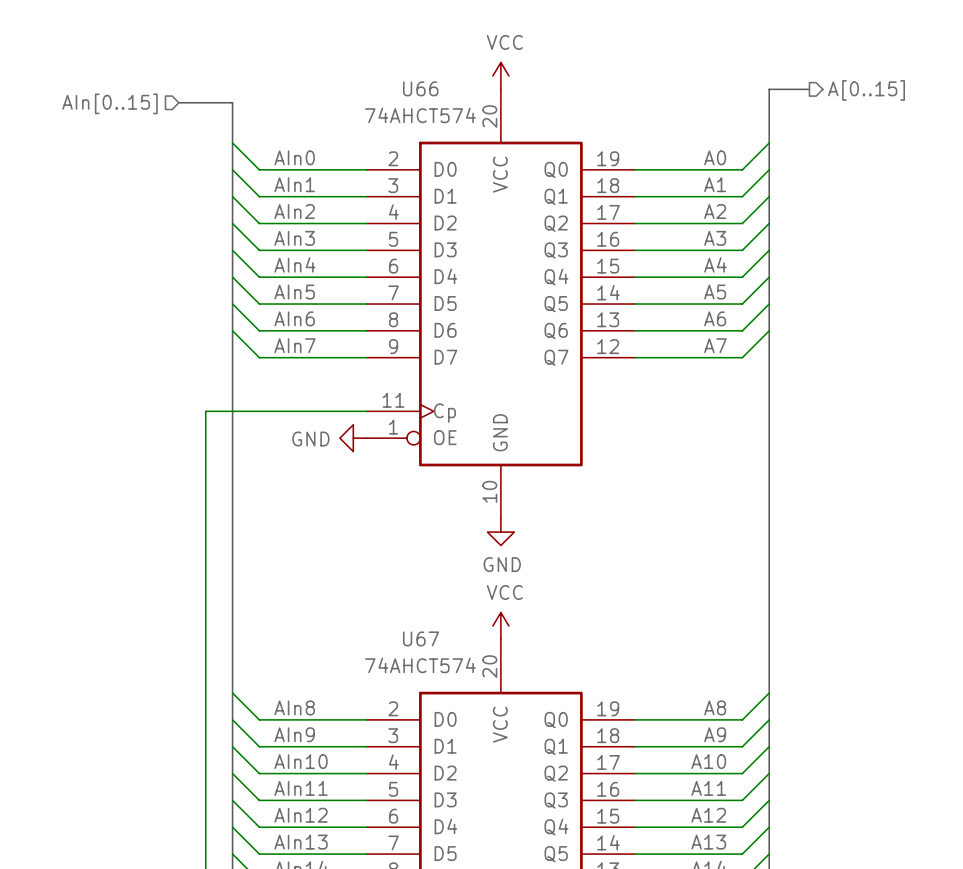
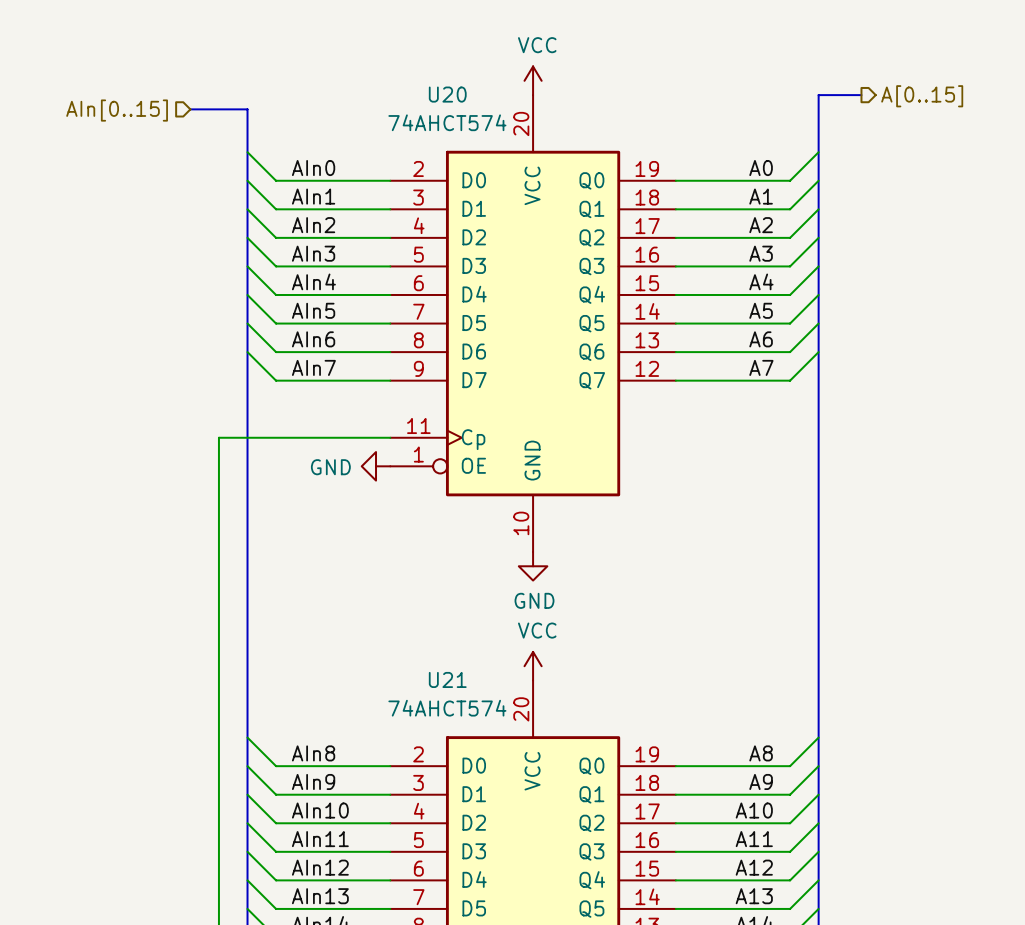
U66 name: U66 (420, 88) -> U20 (447, 94)
U67 name: U67 (421, 638) -> U21 (447, 679)

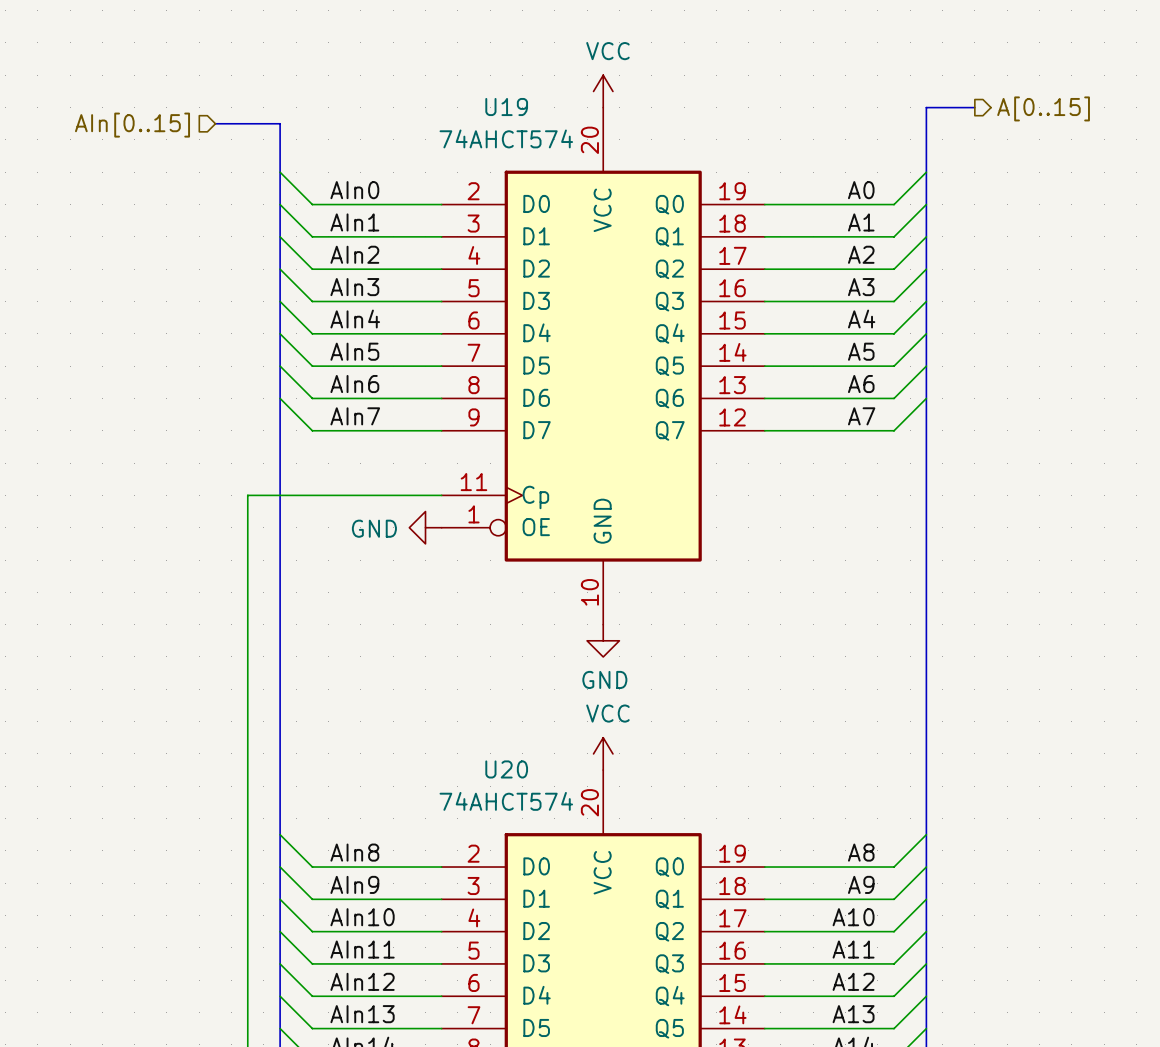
U20 name: U20 (447, 94) -> U19 (506, 107)
U21 name: U21 (447, 679) -> U20 (506, 769)

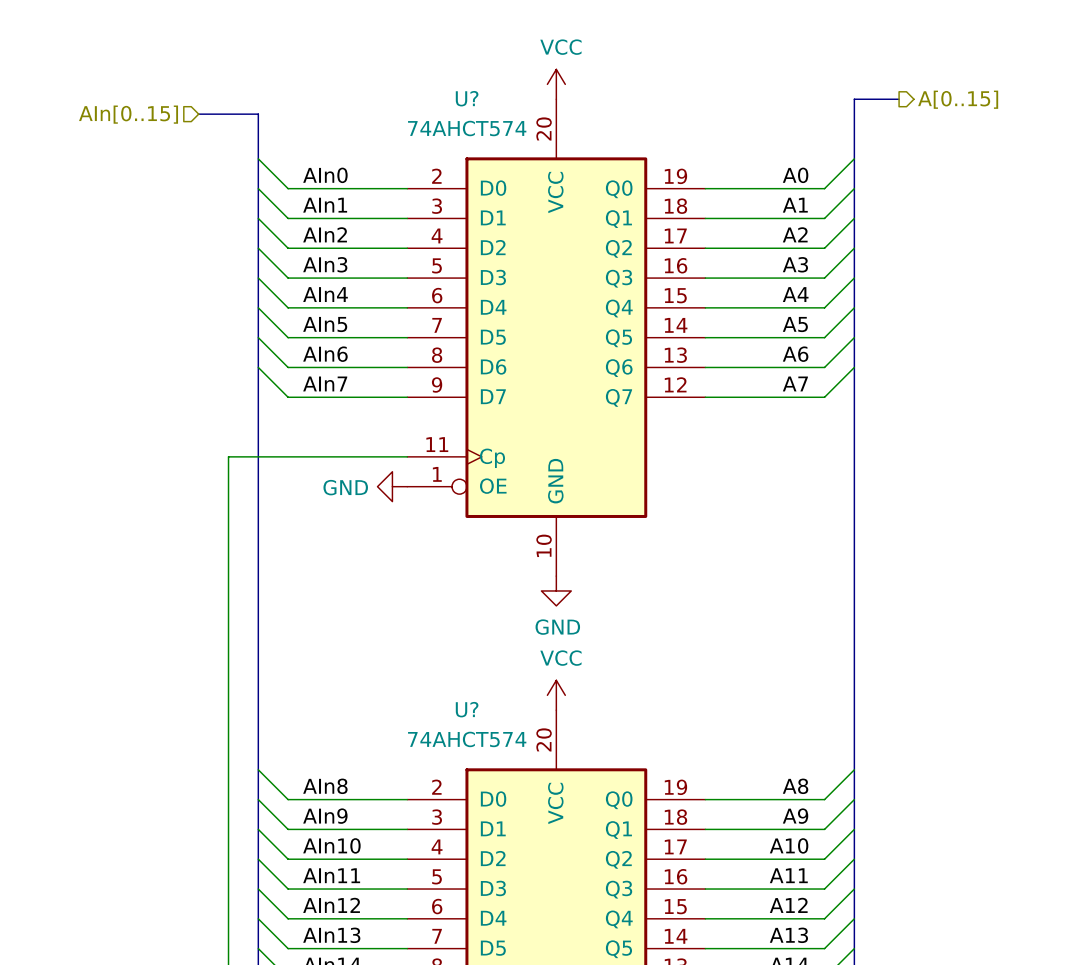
U19 name: U19 (506, 107) -> U? (467, 98)
U20 name: U20 (506, 769) -> U? (467, 709)

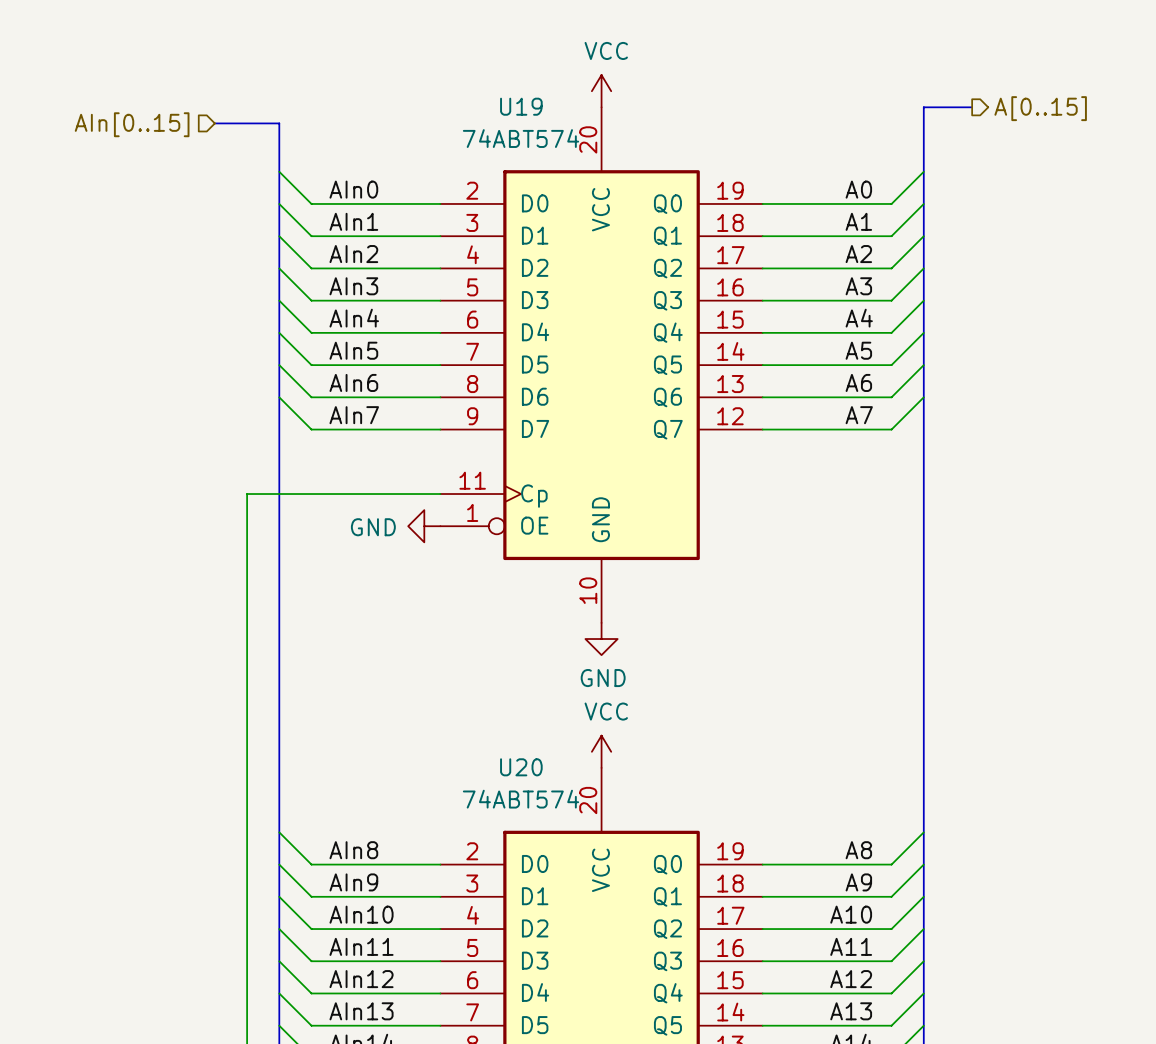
U? name: U? (467, 98) -> U19 (521, 106)
U? value: 74AHCT574 (467, 128) -> 74ABT574 (520, 138)
U? name: U? (467, 709) -> U20 (521, 767)
U? value: 74AHCT574 (467, 739) -> 74ABT574 (520, 799)

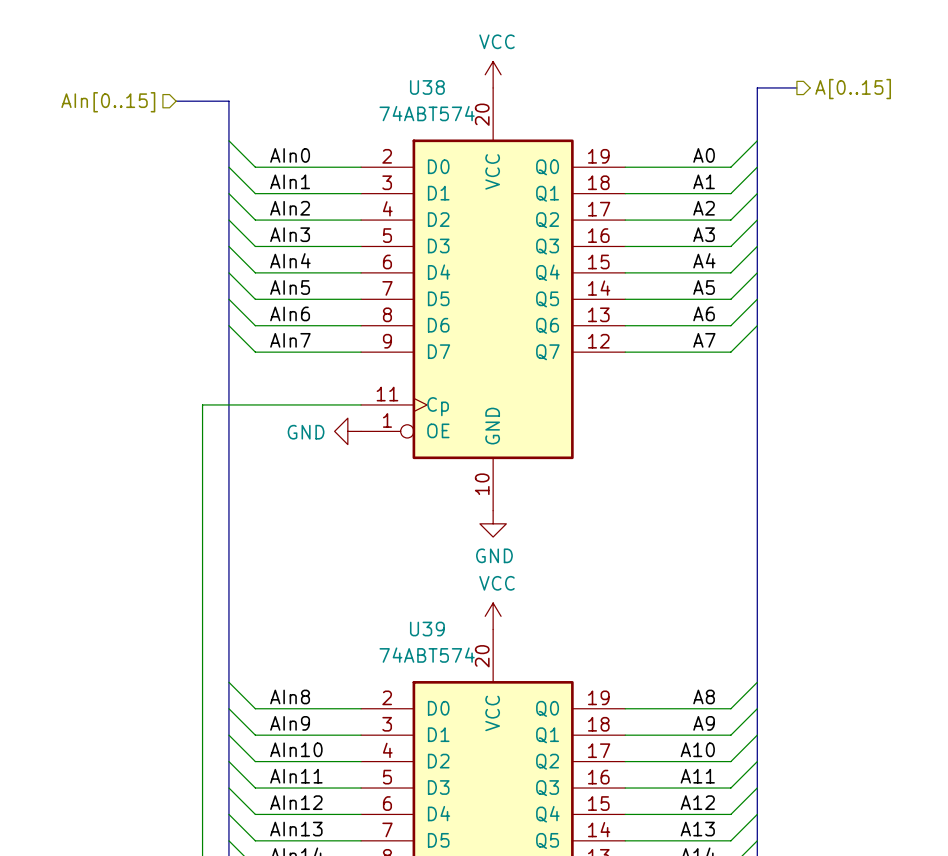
U19 name: U19 (521, 106) -> U38 (427, 87)
U20 name: U20 (521, 767) -> U39 (427, 629)

